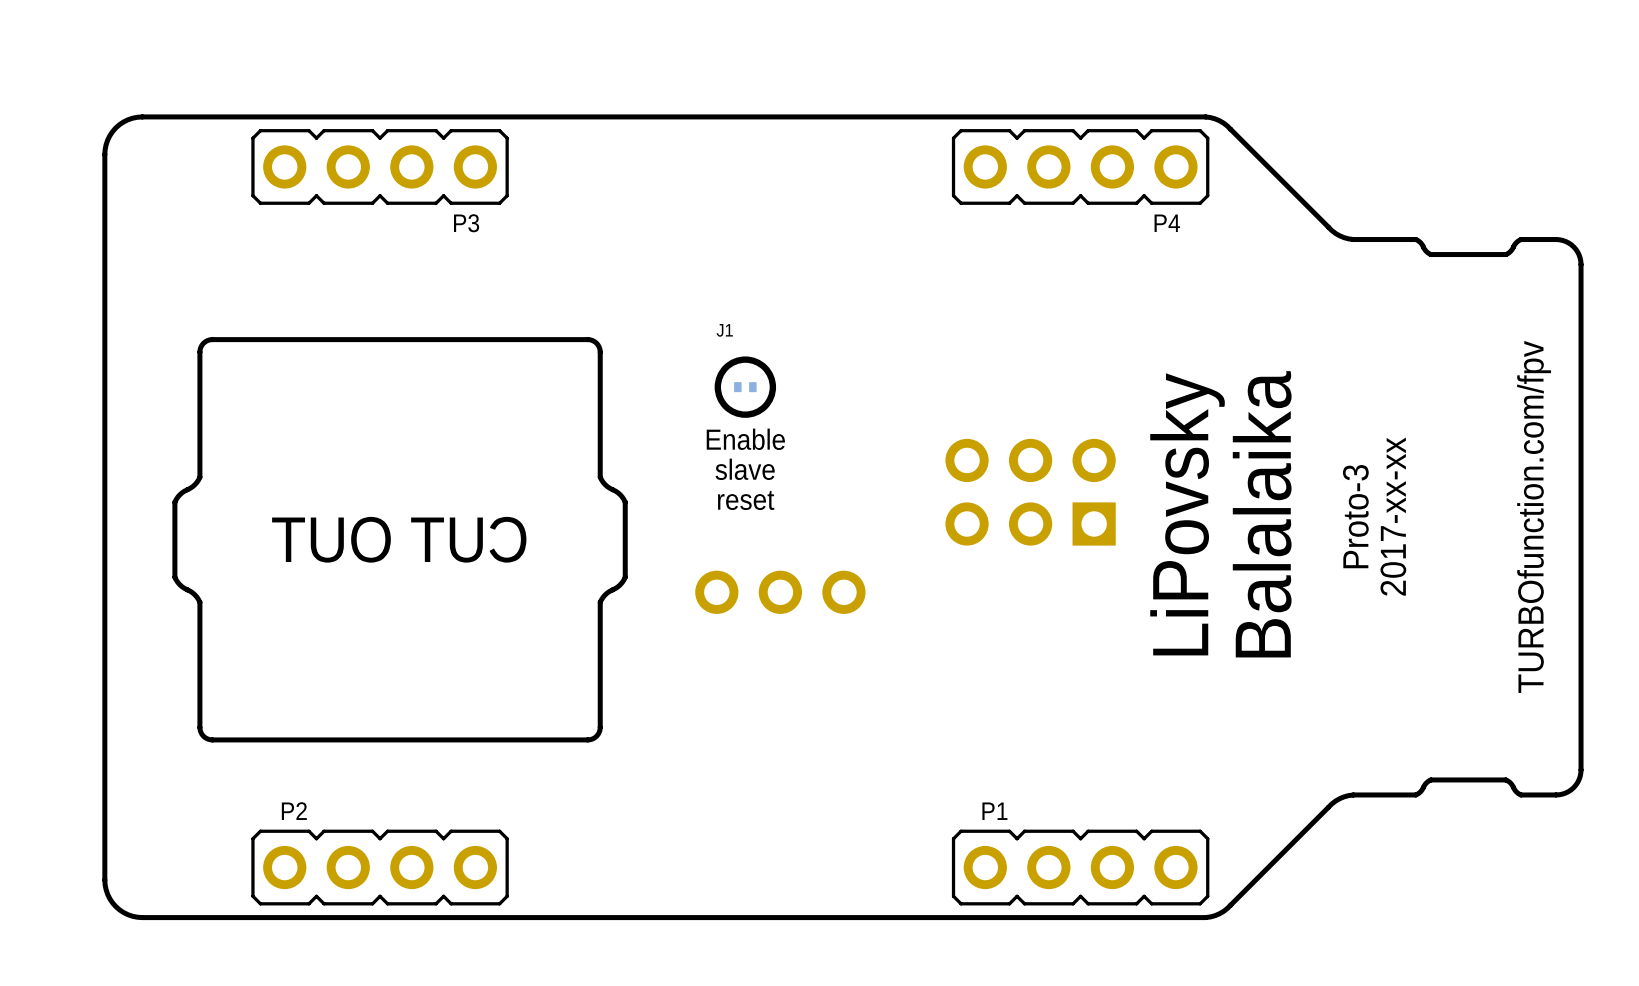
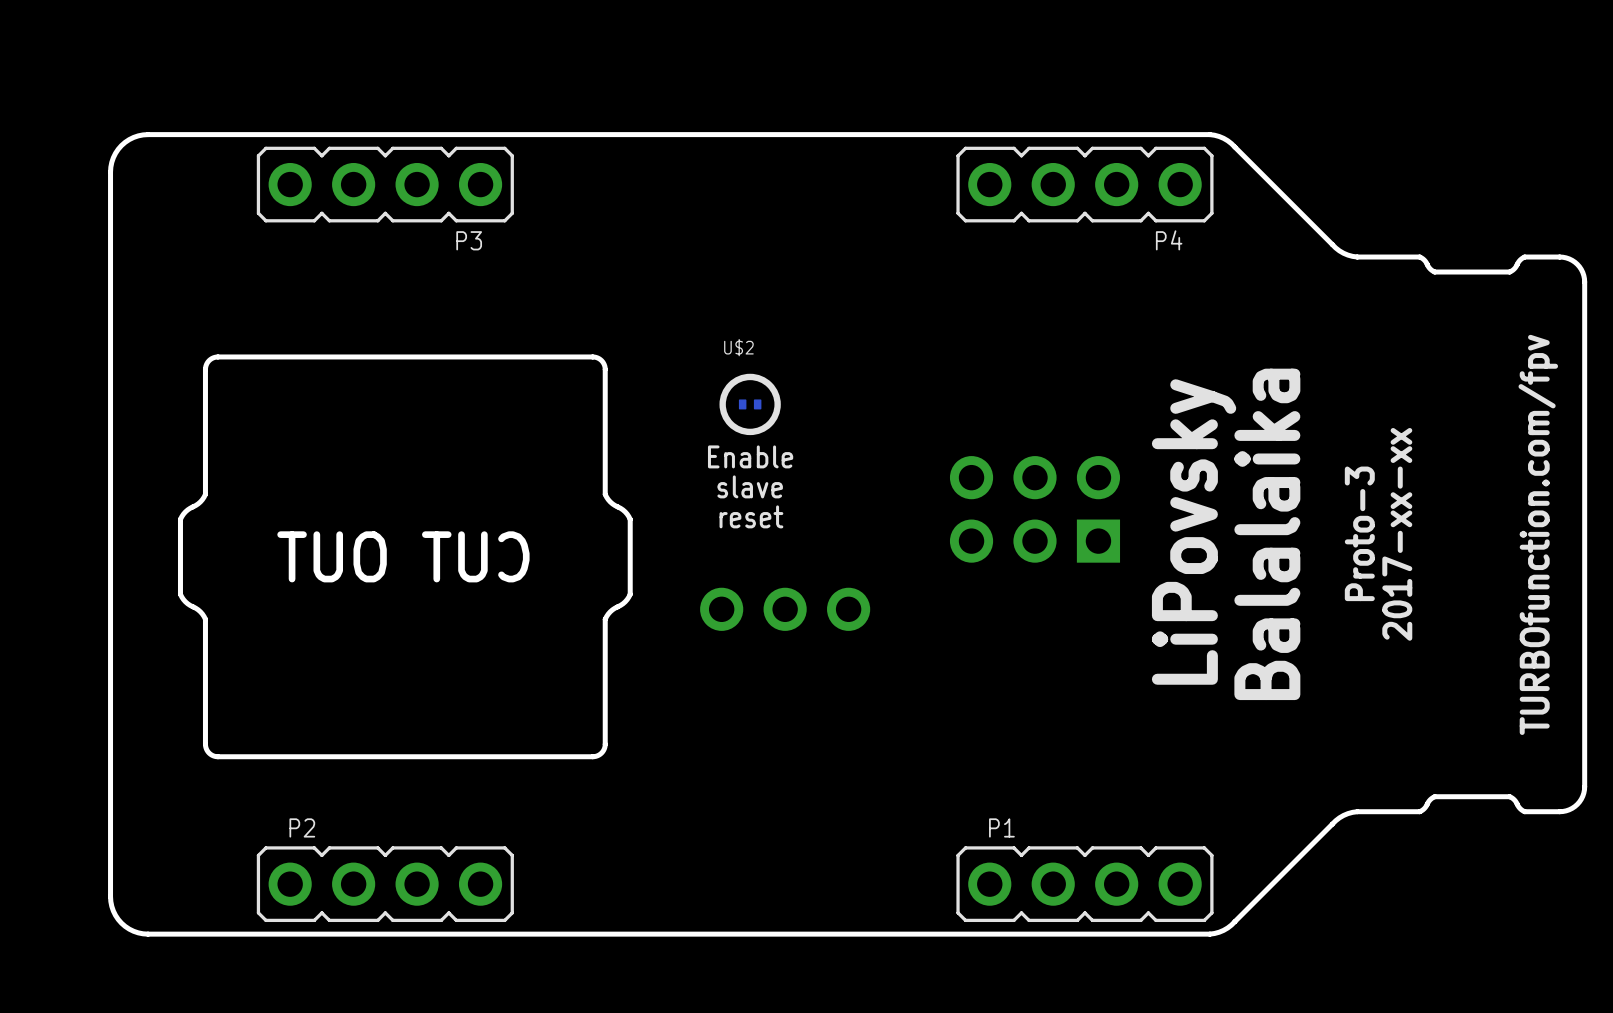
J1 name: J1 (724, 330) -> U$2 (738, 347)

